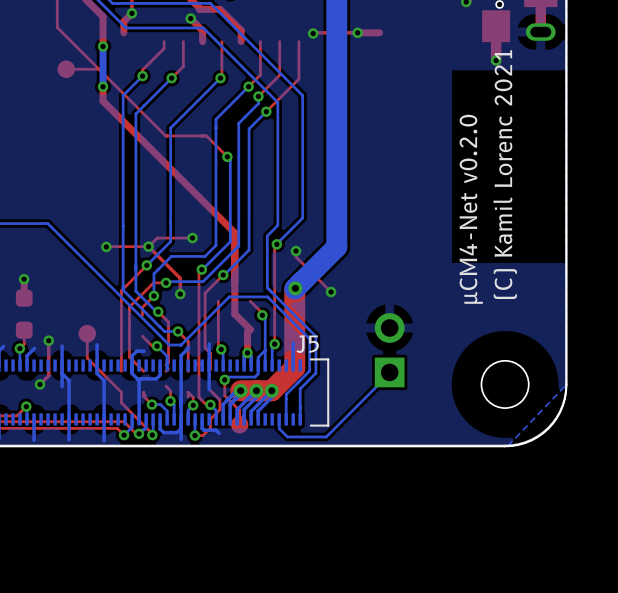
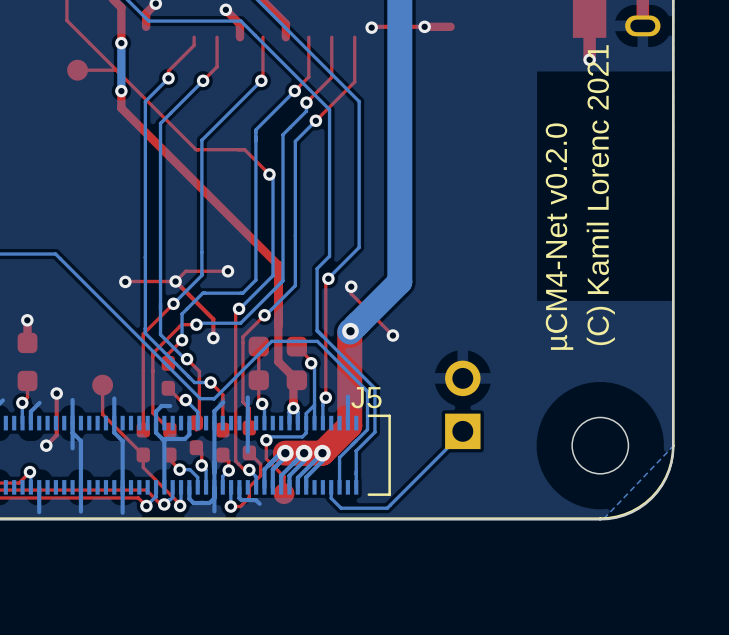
part: none -> (277, 346)
part: none -> (168, 375)
part: none -> (277, 380)
part: none -> (196, 435)
part: none -> (249, 440)
part: none -> (143, 442)
part: none -> (169, 442)
part: none -> (222, 442)

